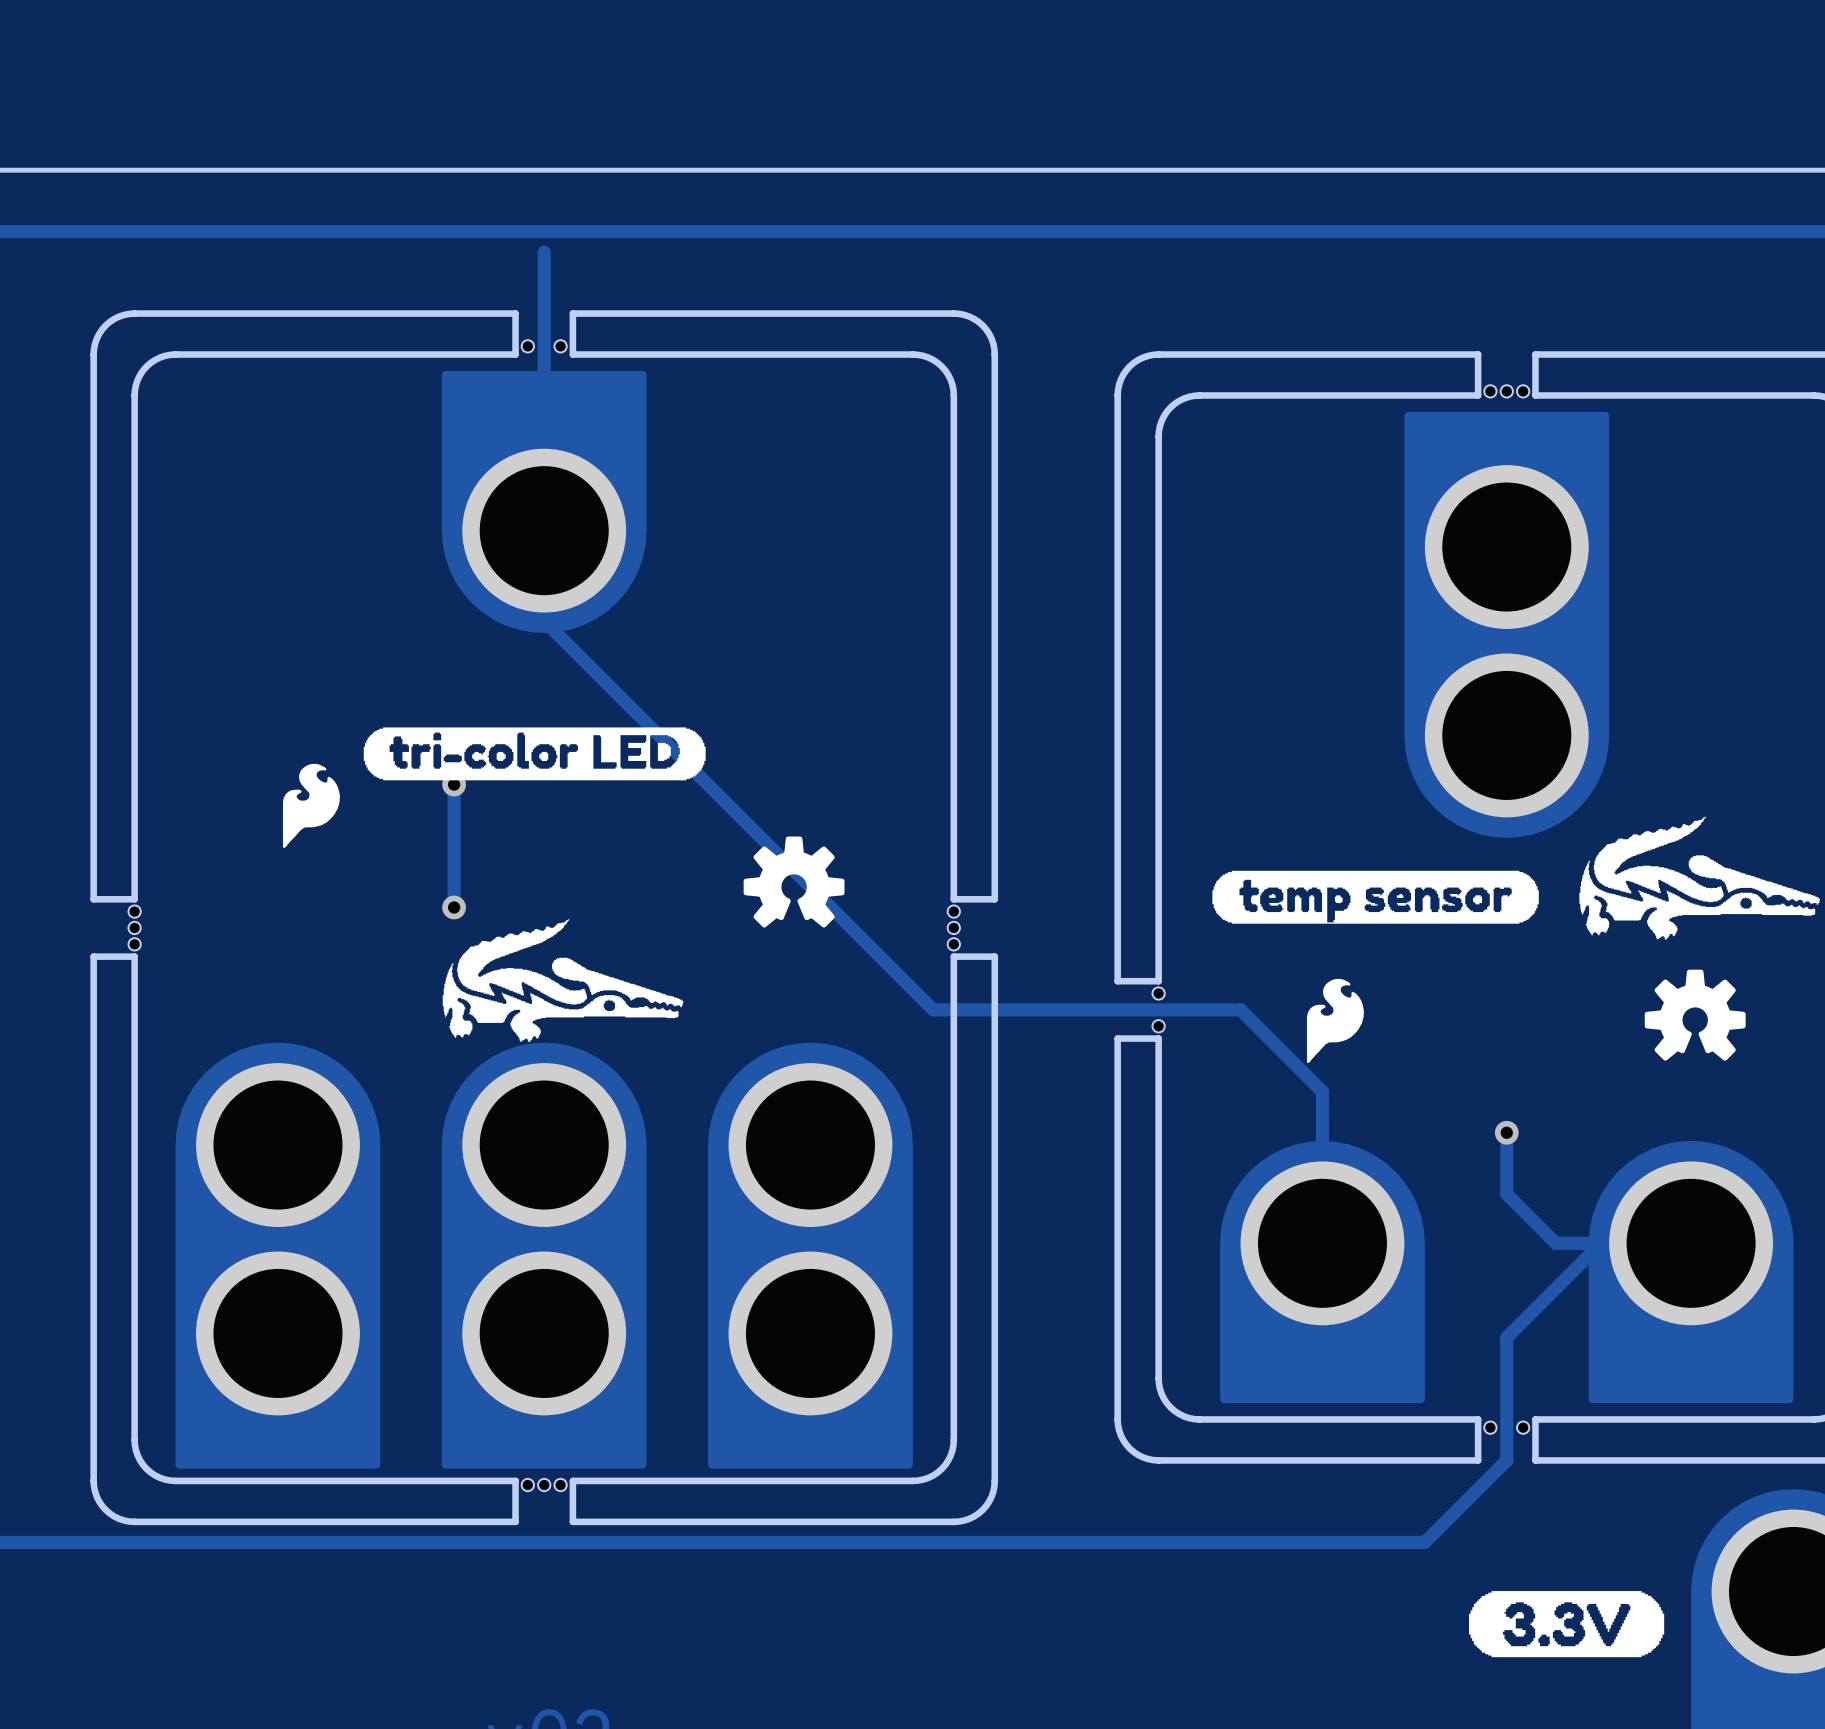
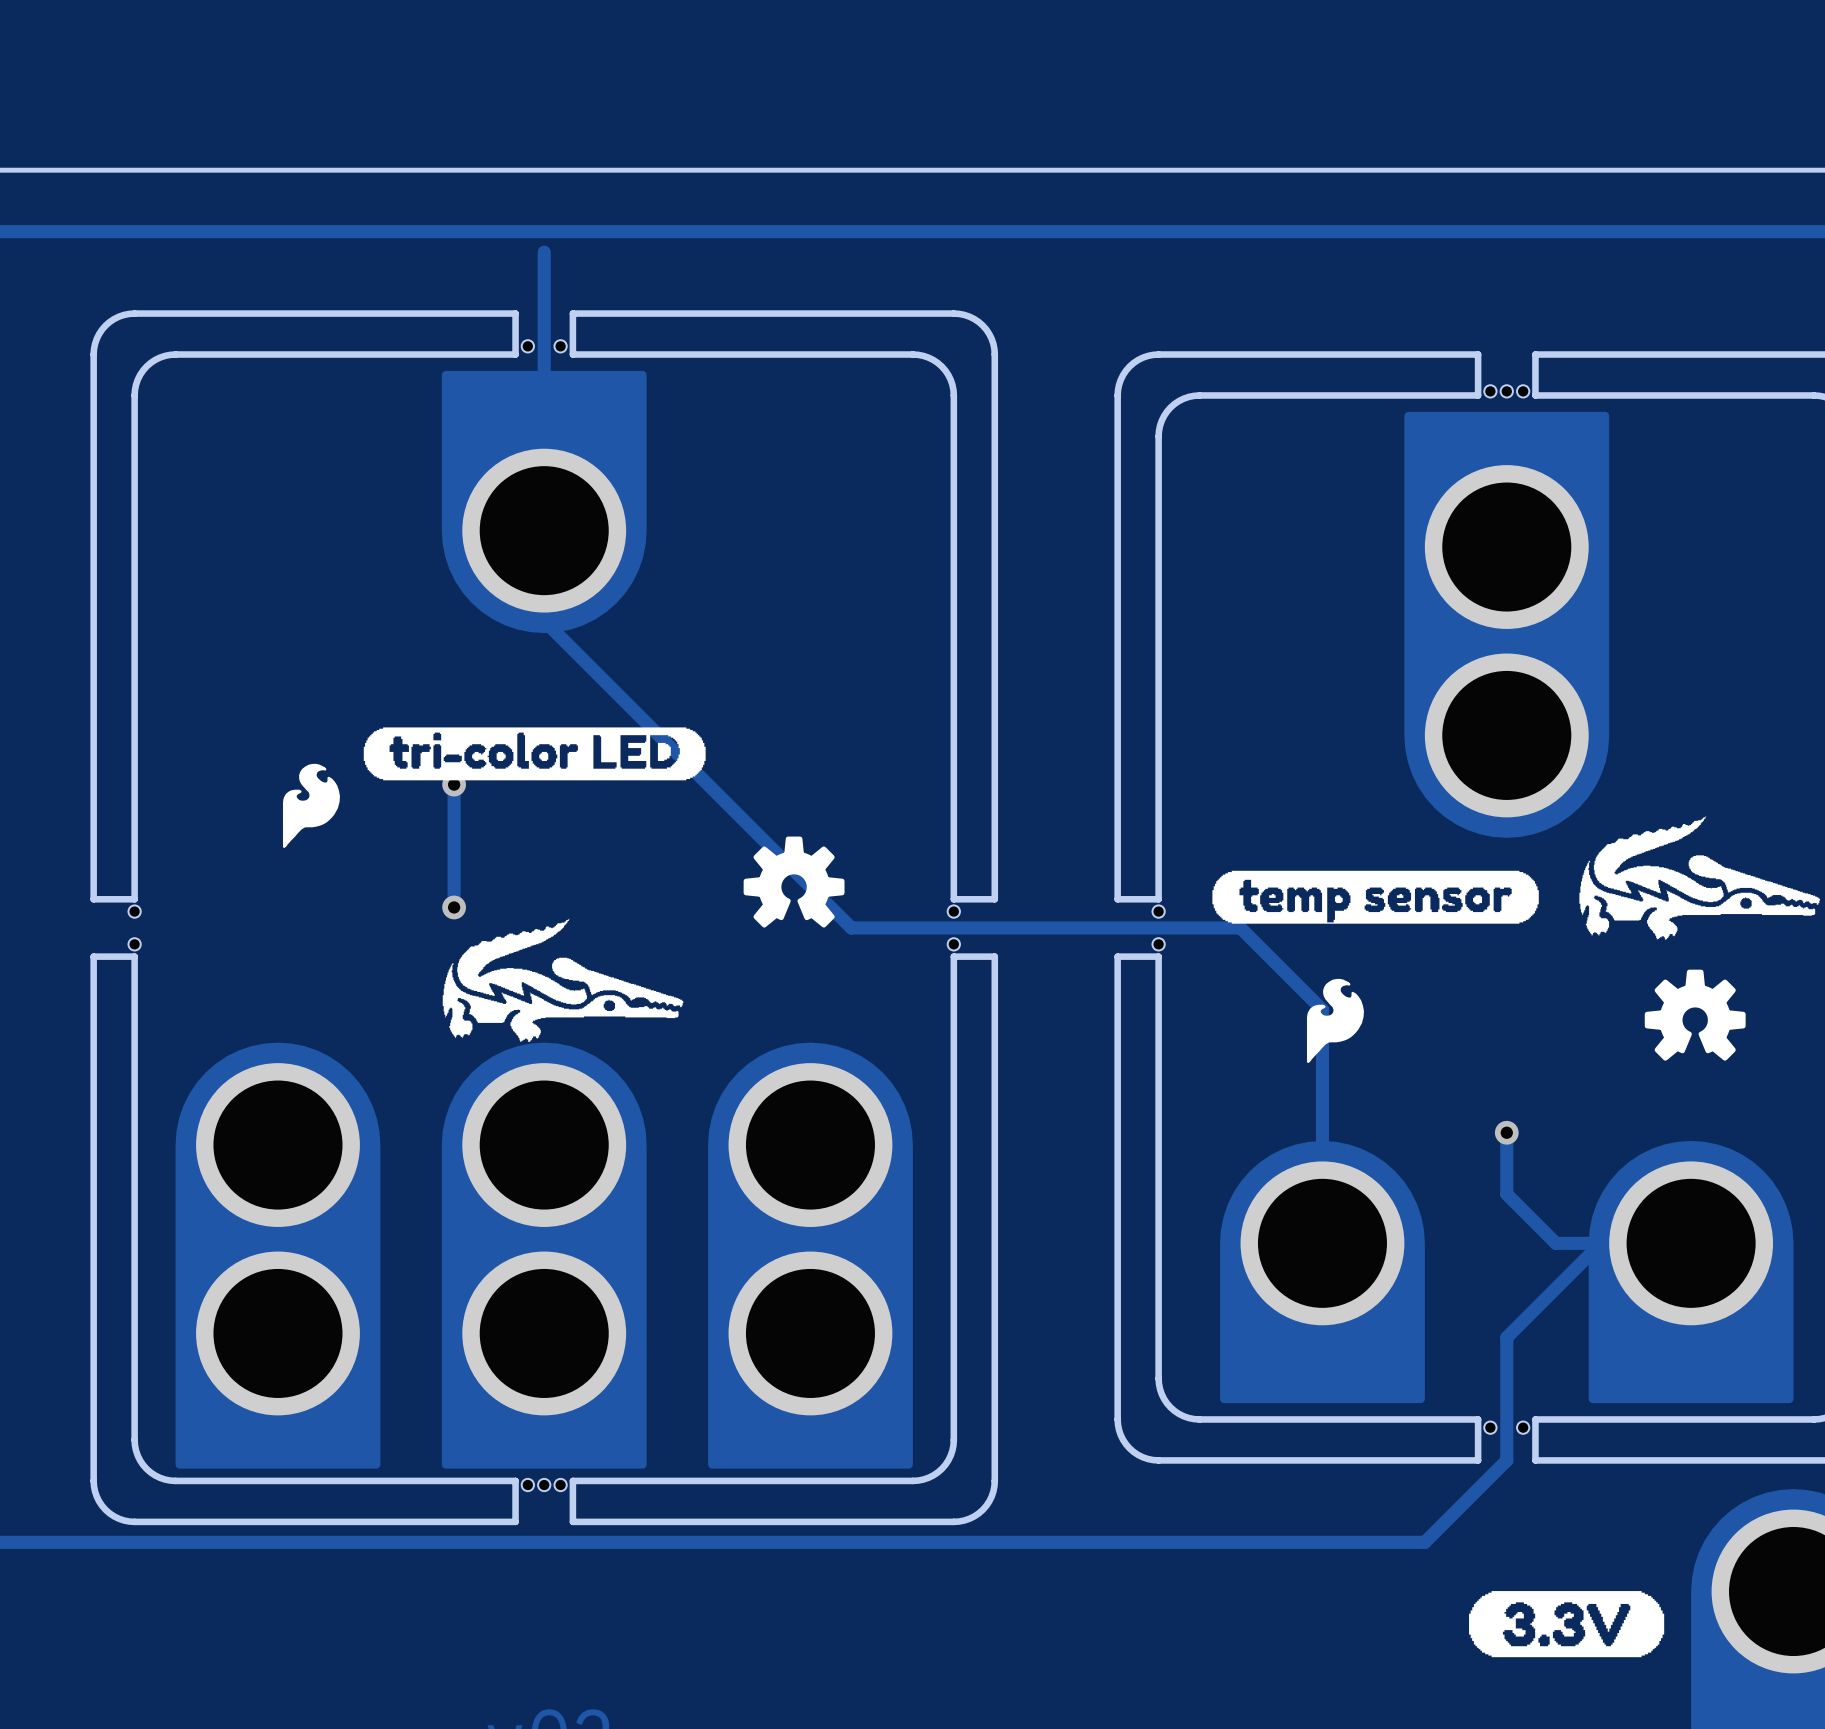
board edge: (1117, 899) (1117, 956) -> (1158, 956) (1117, 956)
board edge: (1158, 899) (1158, 956) -> (1158, 899) (1117, 899)
hole: none -> (1158, 911)
hole: (134, 927) -> none
track: (851, 927) (933, 1009) (1240, 1009) (1322, 1091) -> (851, 927) (1240, 927) (1322, 1009) (1322, 1091)
hole: (953, 927) -> none
hole: none -> (1158, 944)
board edge: (1158, 981) (1117, 981) -> (1158, 981) (1158, 1038)
hole: (1158, 993) -> none
hole: (1158, 1026) -> none
board edge: (1158, 1038) (1117, 1038) -> (1117, 981) (1117, 1038)

